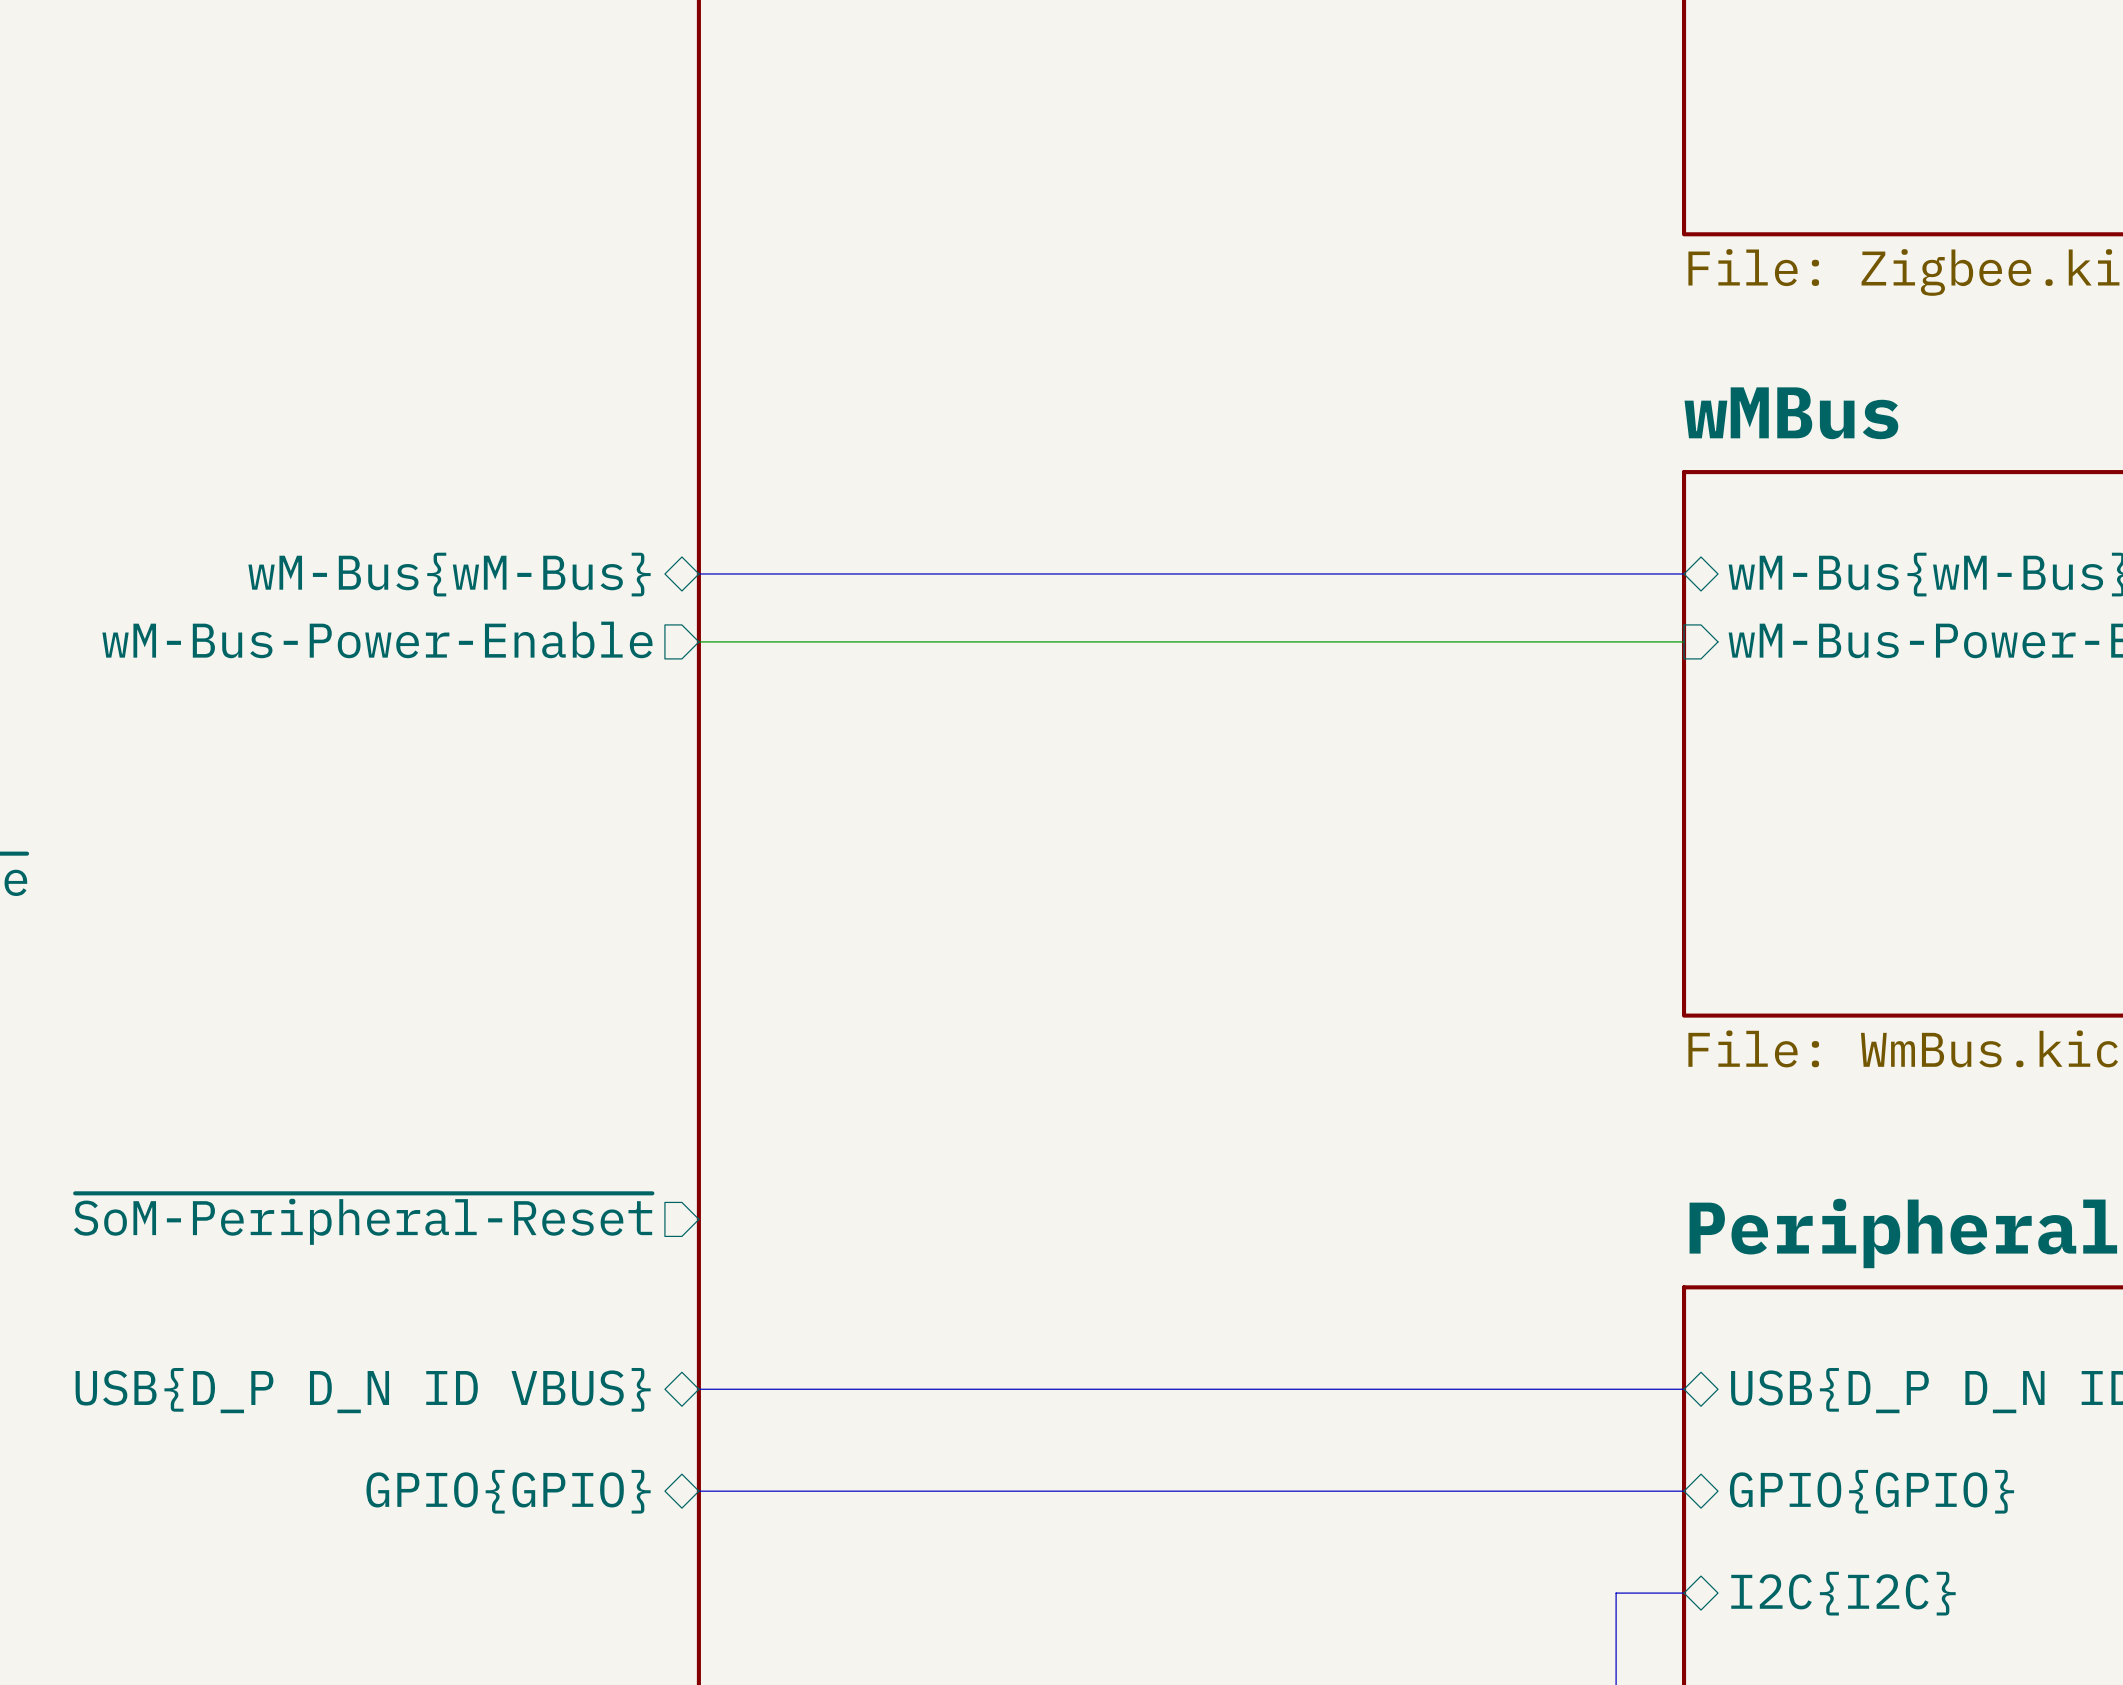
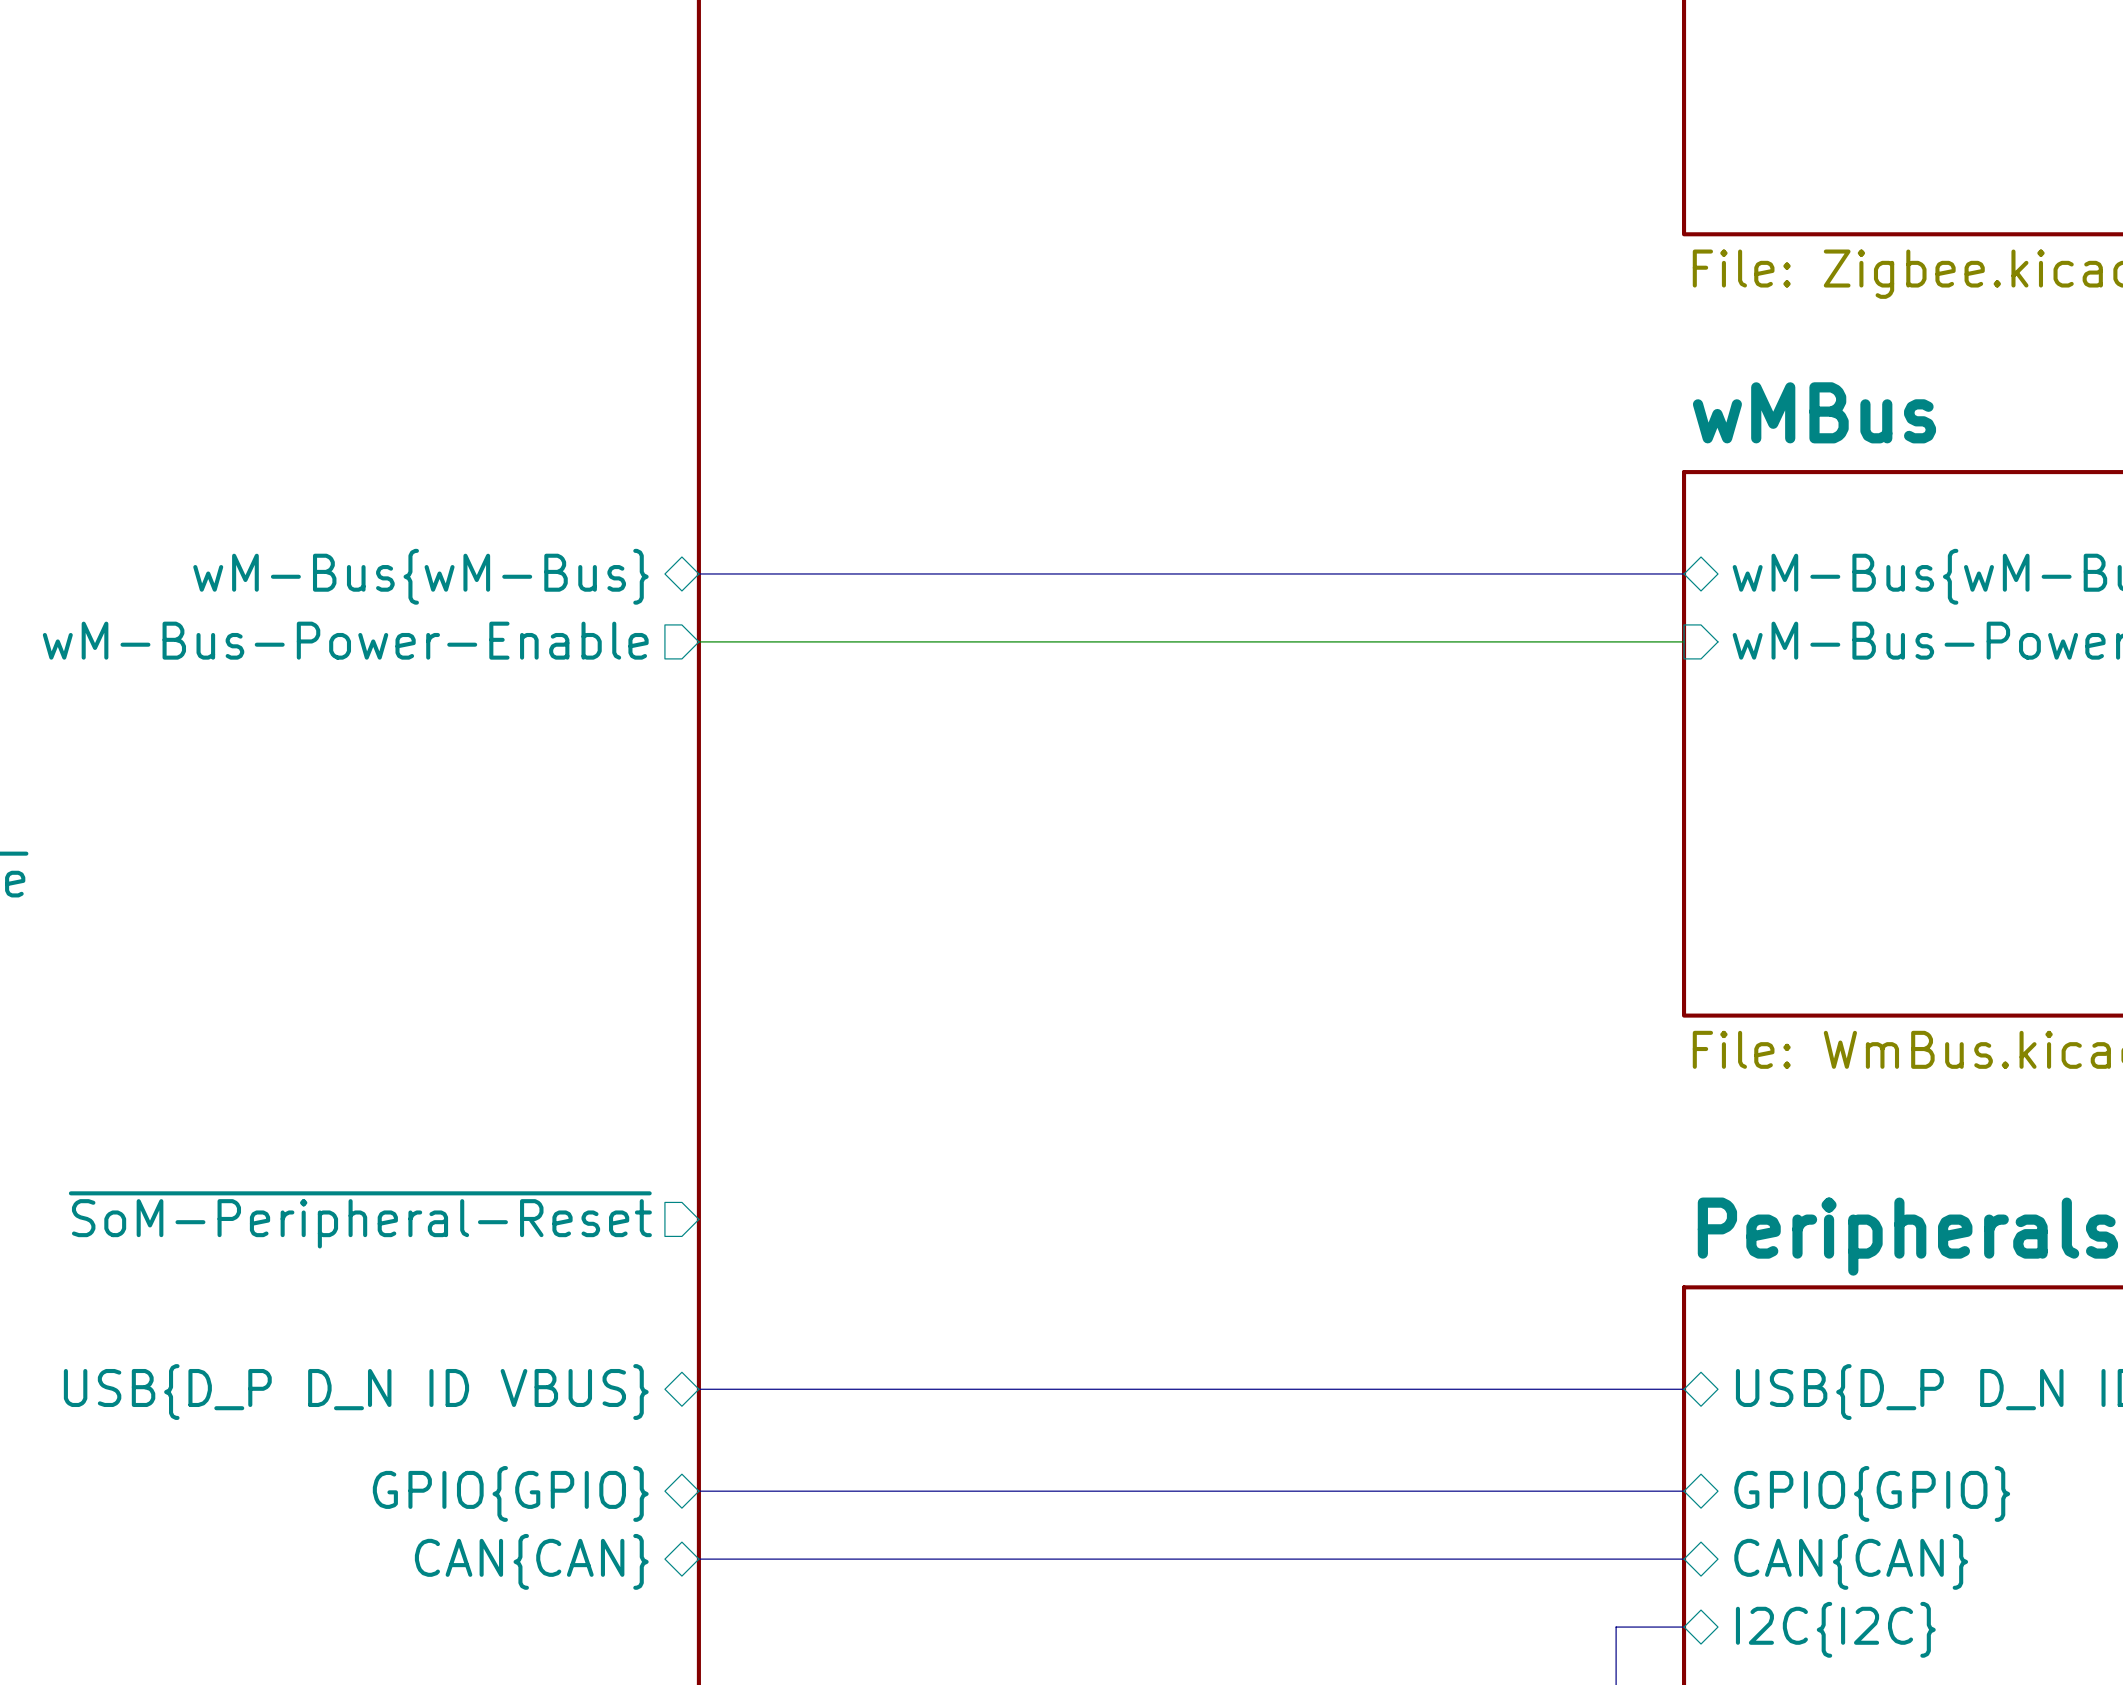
sheet pin: none -> CAN{CAN} (531, 1561)
bus: none -> (698, 1559) (1684, 1559)
sheet pin: none -> CAN{CAN} (1851, 1561)
bus: (1684, 1593) (1616, 1593) (1616, 1627) -> (1684, 1627) (1616, 1627)
sheet pin position: I2C{I2C} (1843, 1593) -> I2C{I2C} (1835, 1629)

